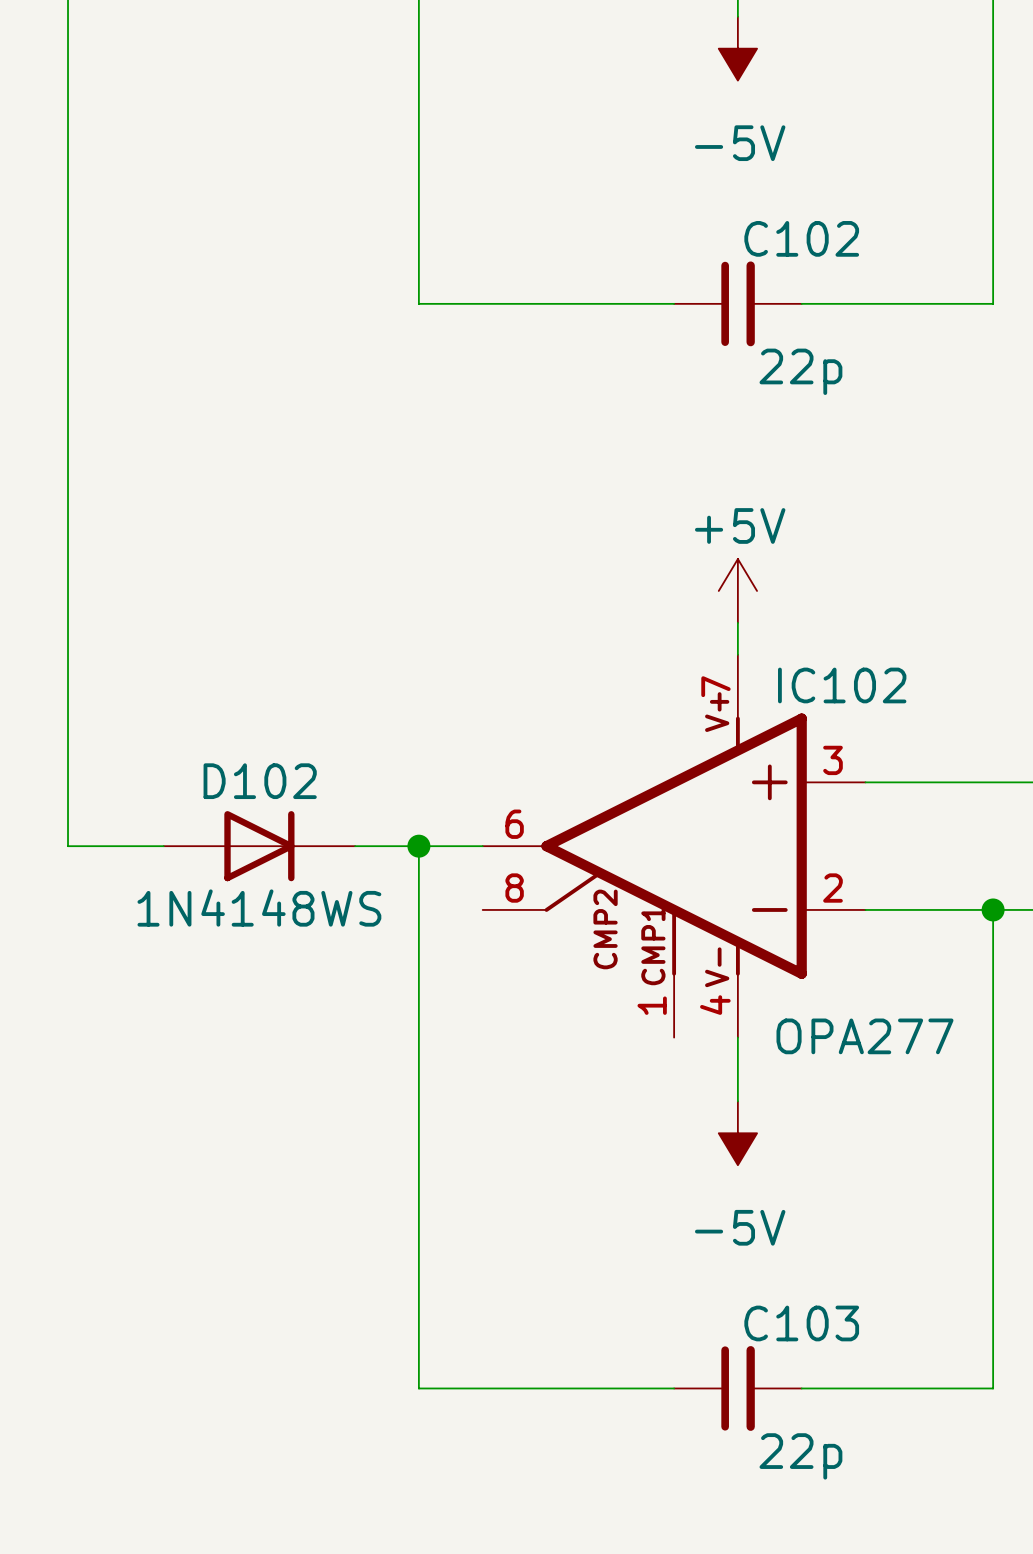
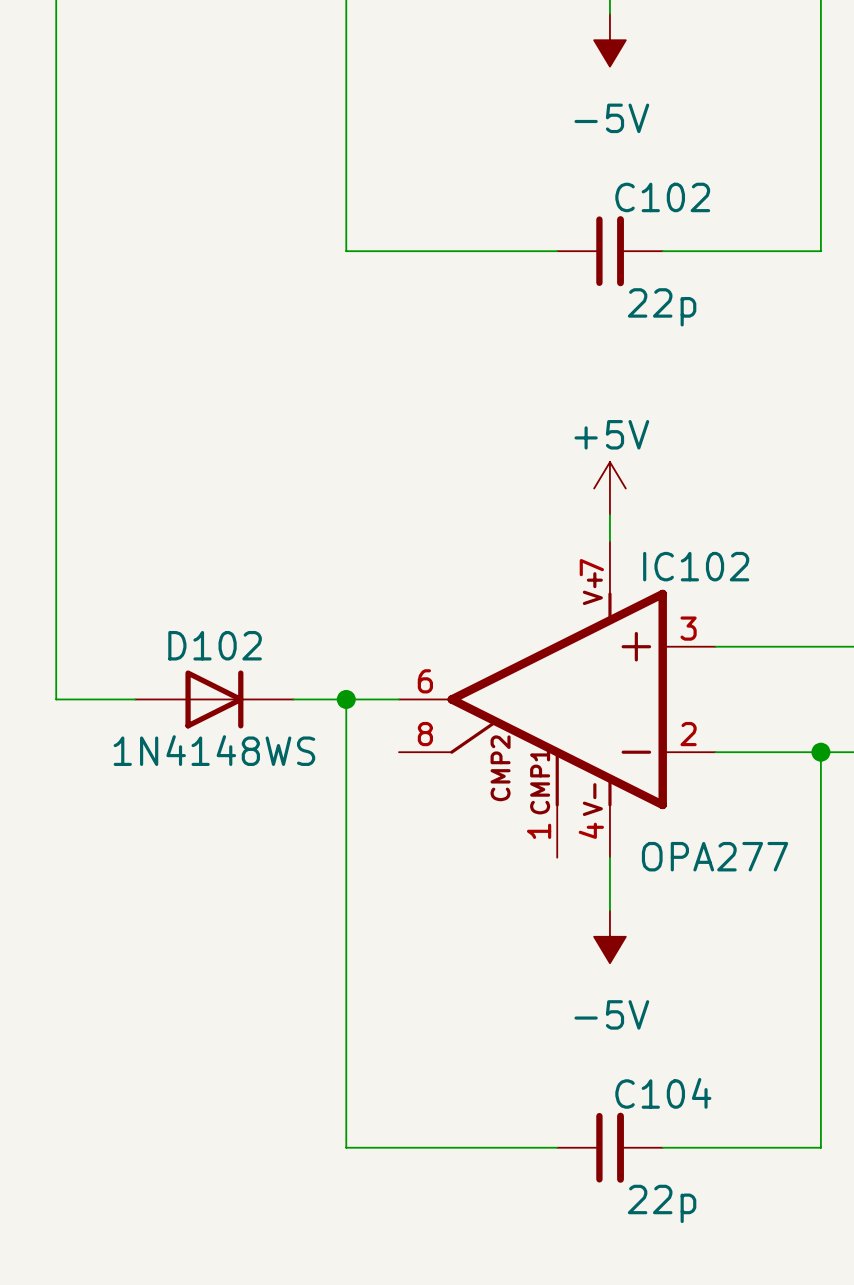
C103 name: C103 (801, 1323) -> C104 (663, 1093)

